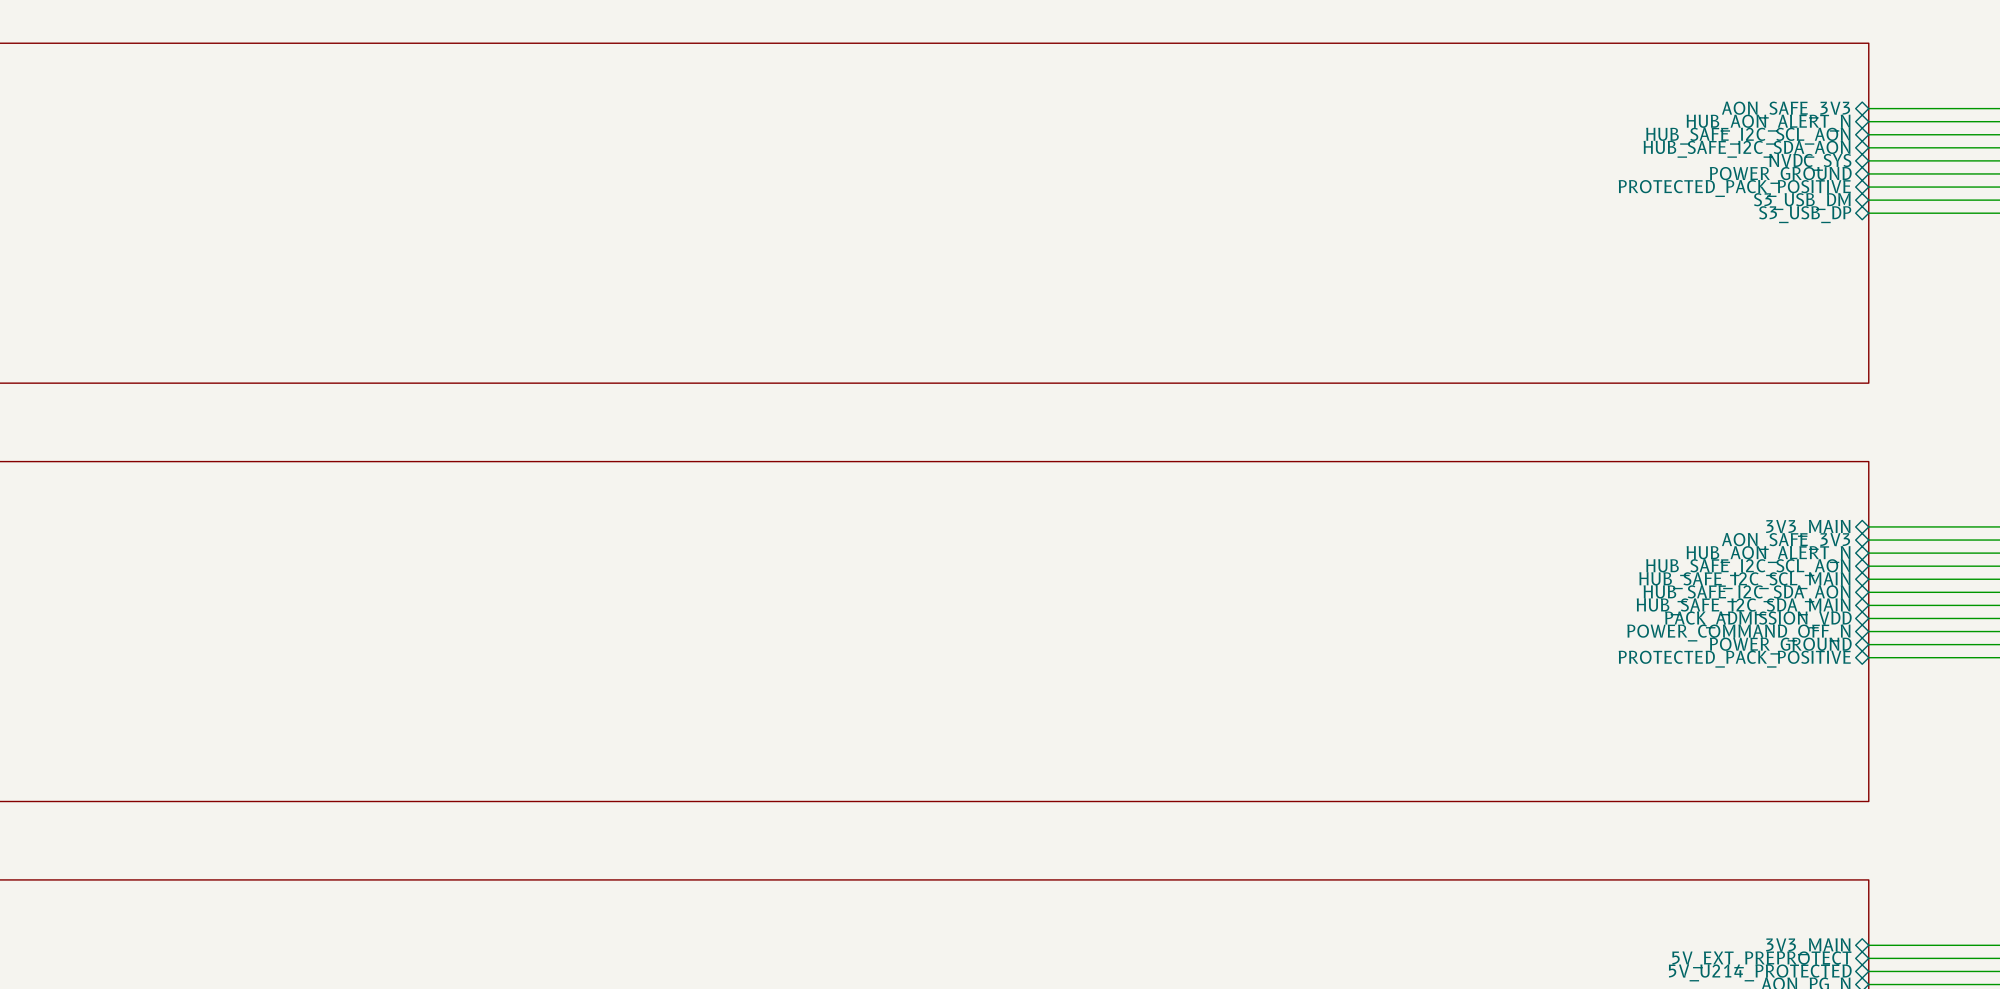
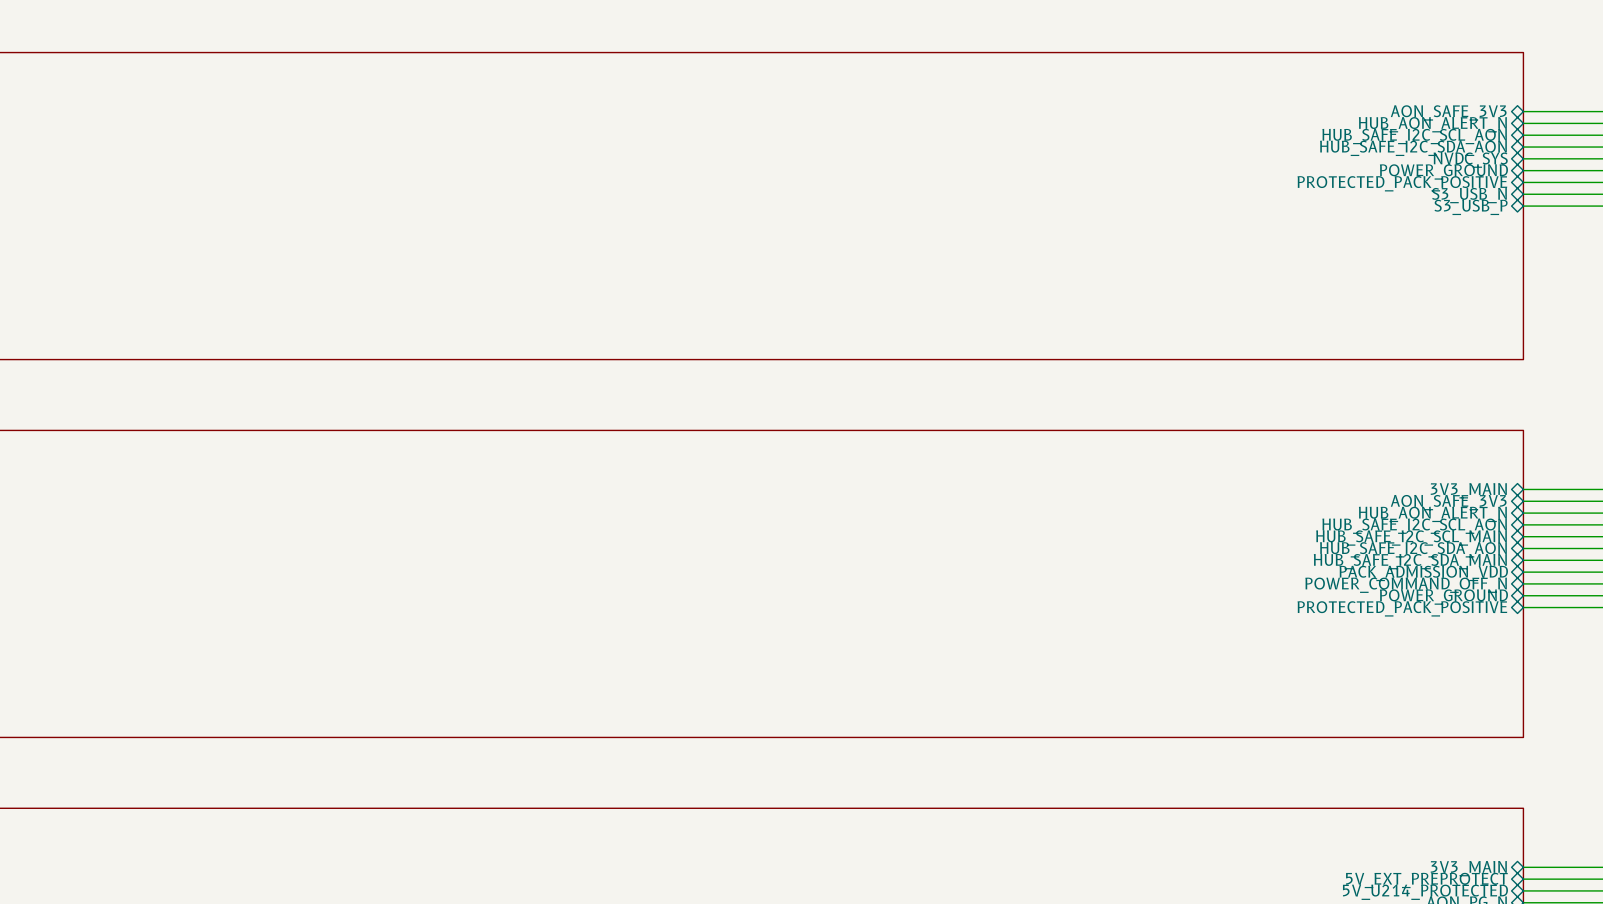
sheet pin: S3_USB_DM (1802, 201) -> S3_USB_N (1469, 195)
sheet pin: S3_USB_DP (1805, 214) -> S3_USB_P (1471, 207)

